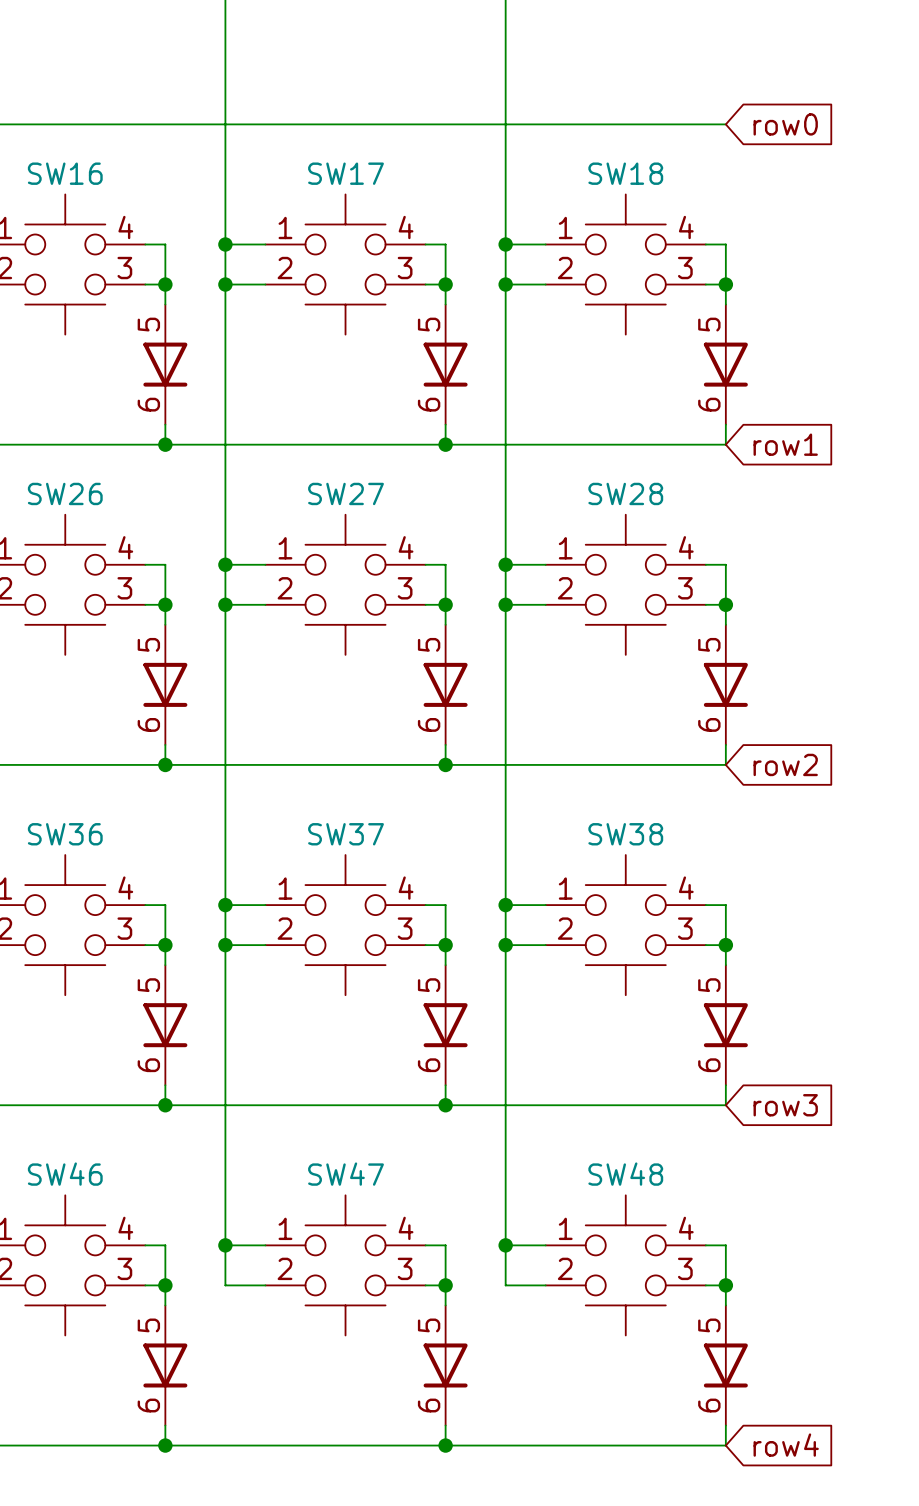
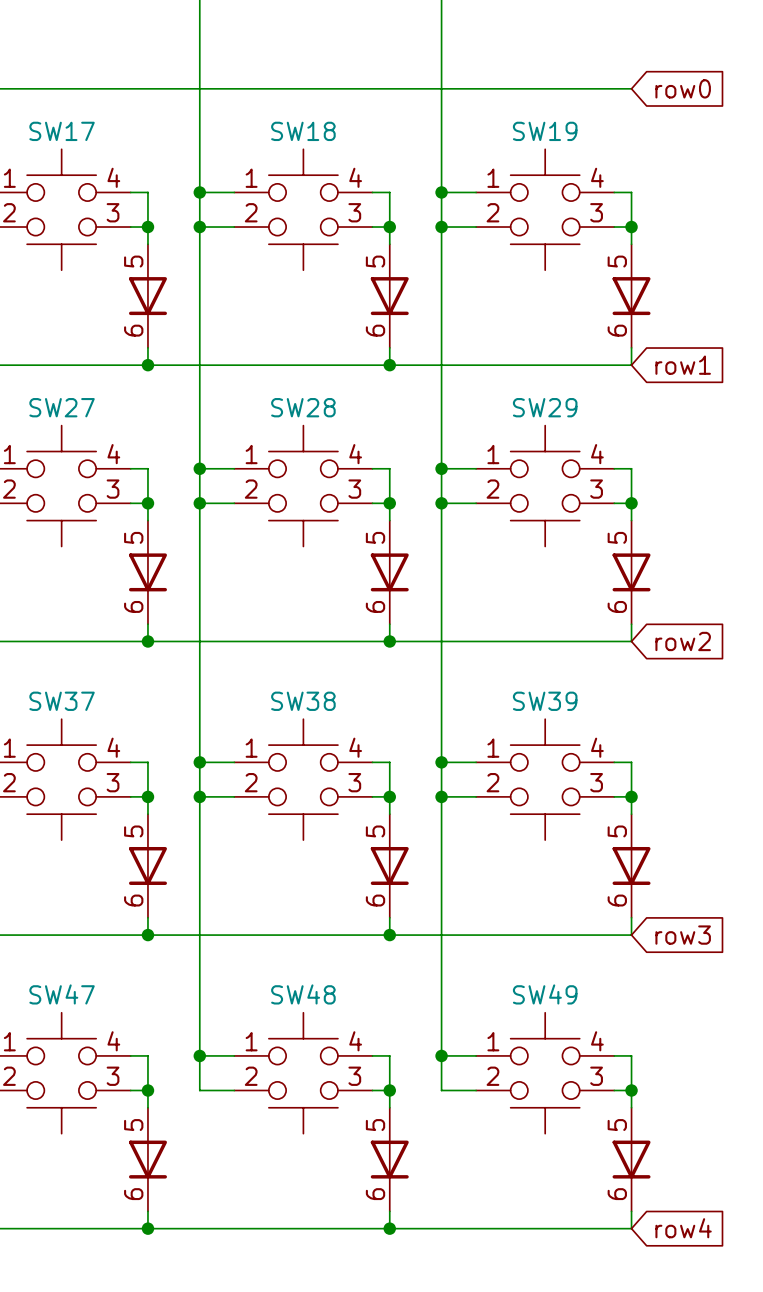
SW16 name: SW16 (65, 173) -> SW17 (62, 131)
SW17 name: SW17 (346, 173) -> SW18 (303, 131)
SW18 name: SW18 (625, 173) -> SW19 (545, 131)
SW26 name: SW26 (65, 493) -> SW27 (62, 407)
SW27 name: SW27 (346, 493) -> SW28 (303, 407)
SW28 name: SW28 (625, 493) -> SW29 (545, 407)
SW36 name: SW36 (65, 834) -> SW37 (62, 701)
SW37 name: SW37 (346, 834) -> SW38 (303, 701)
SW38 name: SW38 (625, 834) -> SW39 (545, 701)
SW46 name: SW46 (65, 1174) -> SW47 (62, 994)
SW47 name: SW47 (346, 1174) -> SW48 (303, 994)
SW48 name: SW48 (625, 1174) -> SW49 (545, 994)

